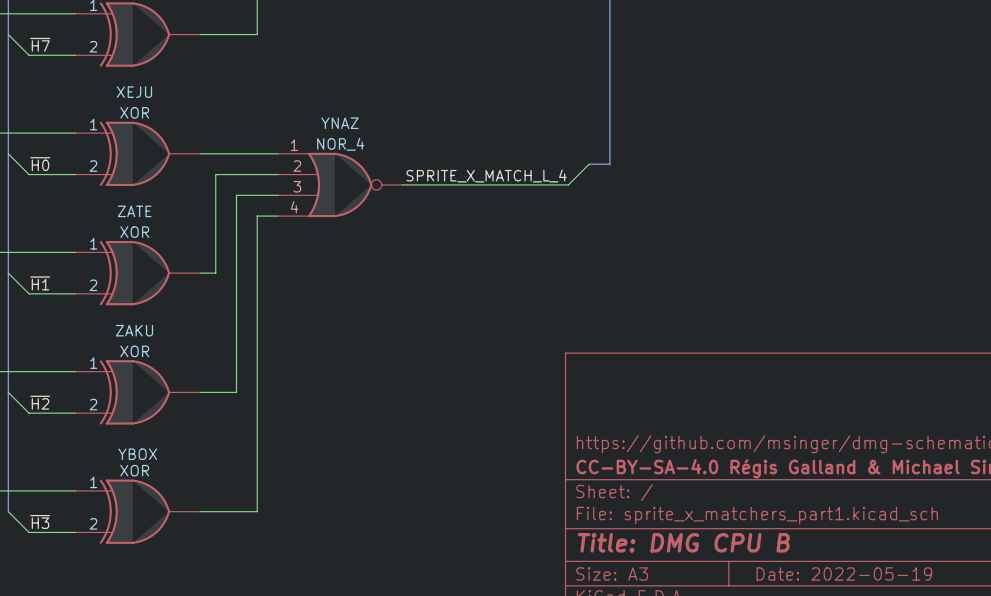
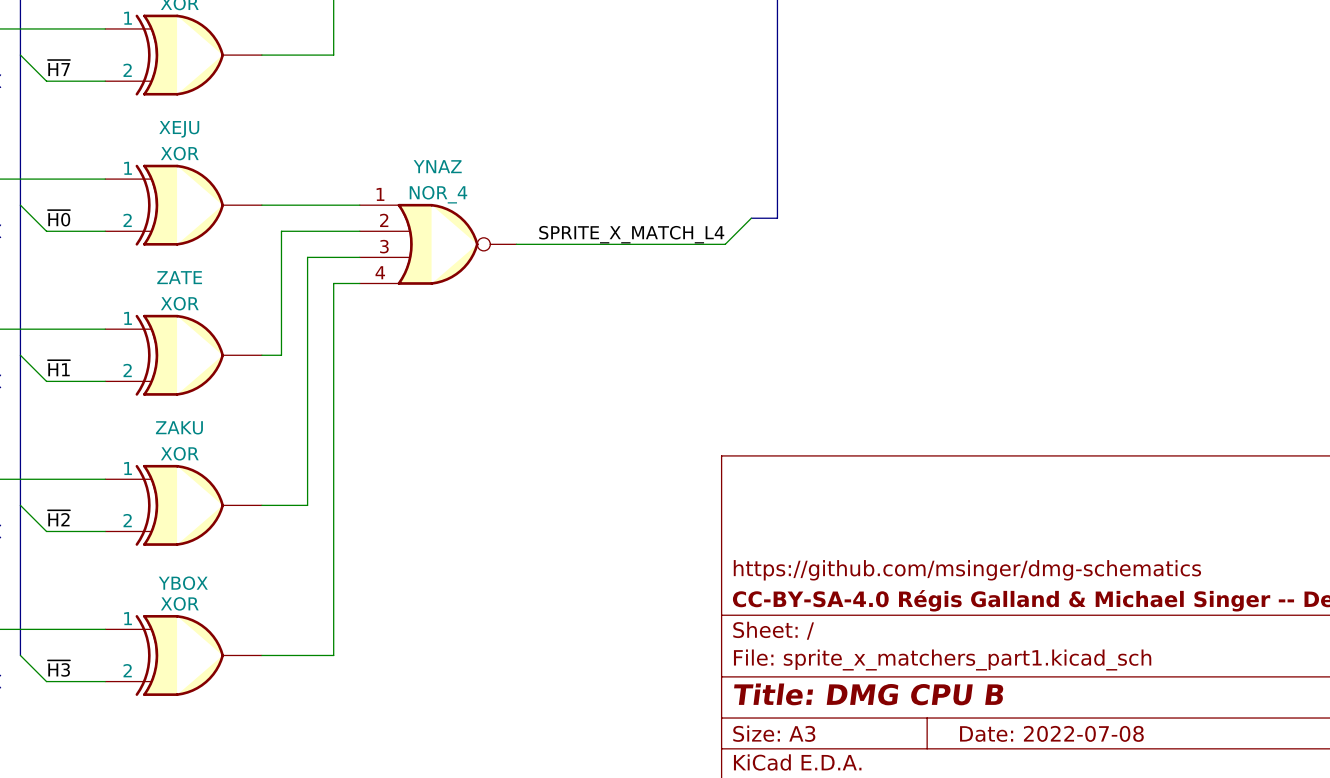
label: SPRITE_X_MATCH_L_4 (486, 175) -> SPRITE_X_MATCH_L4 (631, 234)
title block: Date: 2022-05-19 (844, 573) -> Date: 2022-07-08 (1051, 733)

